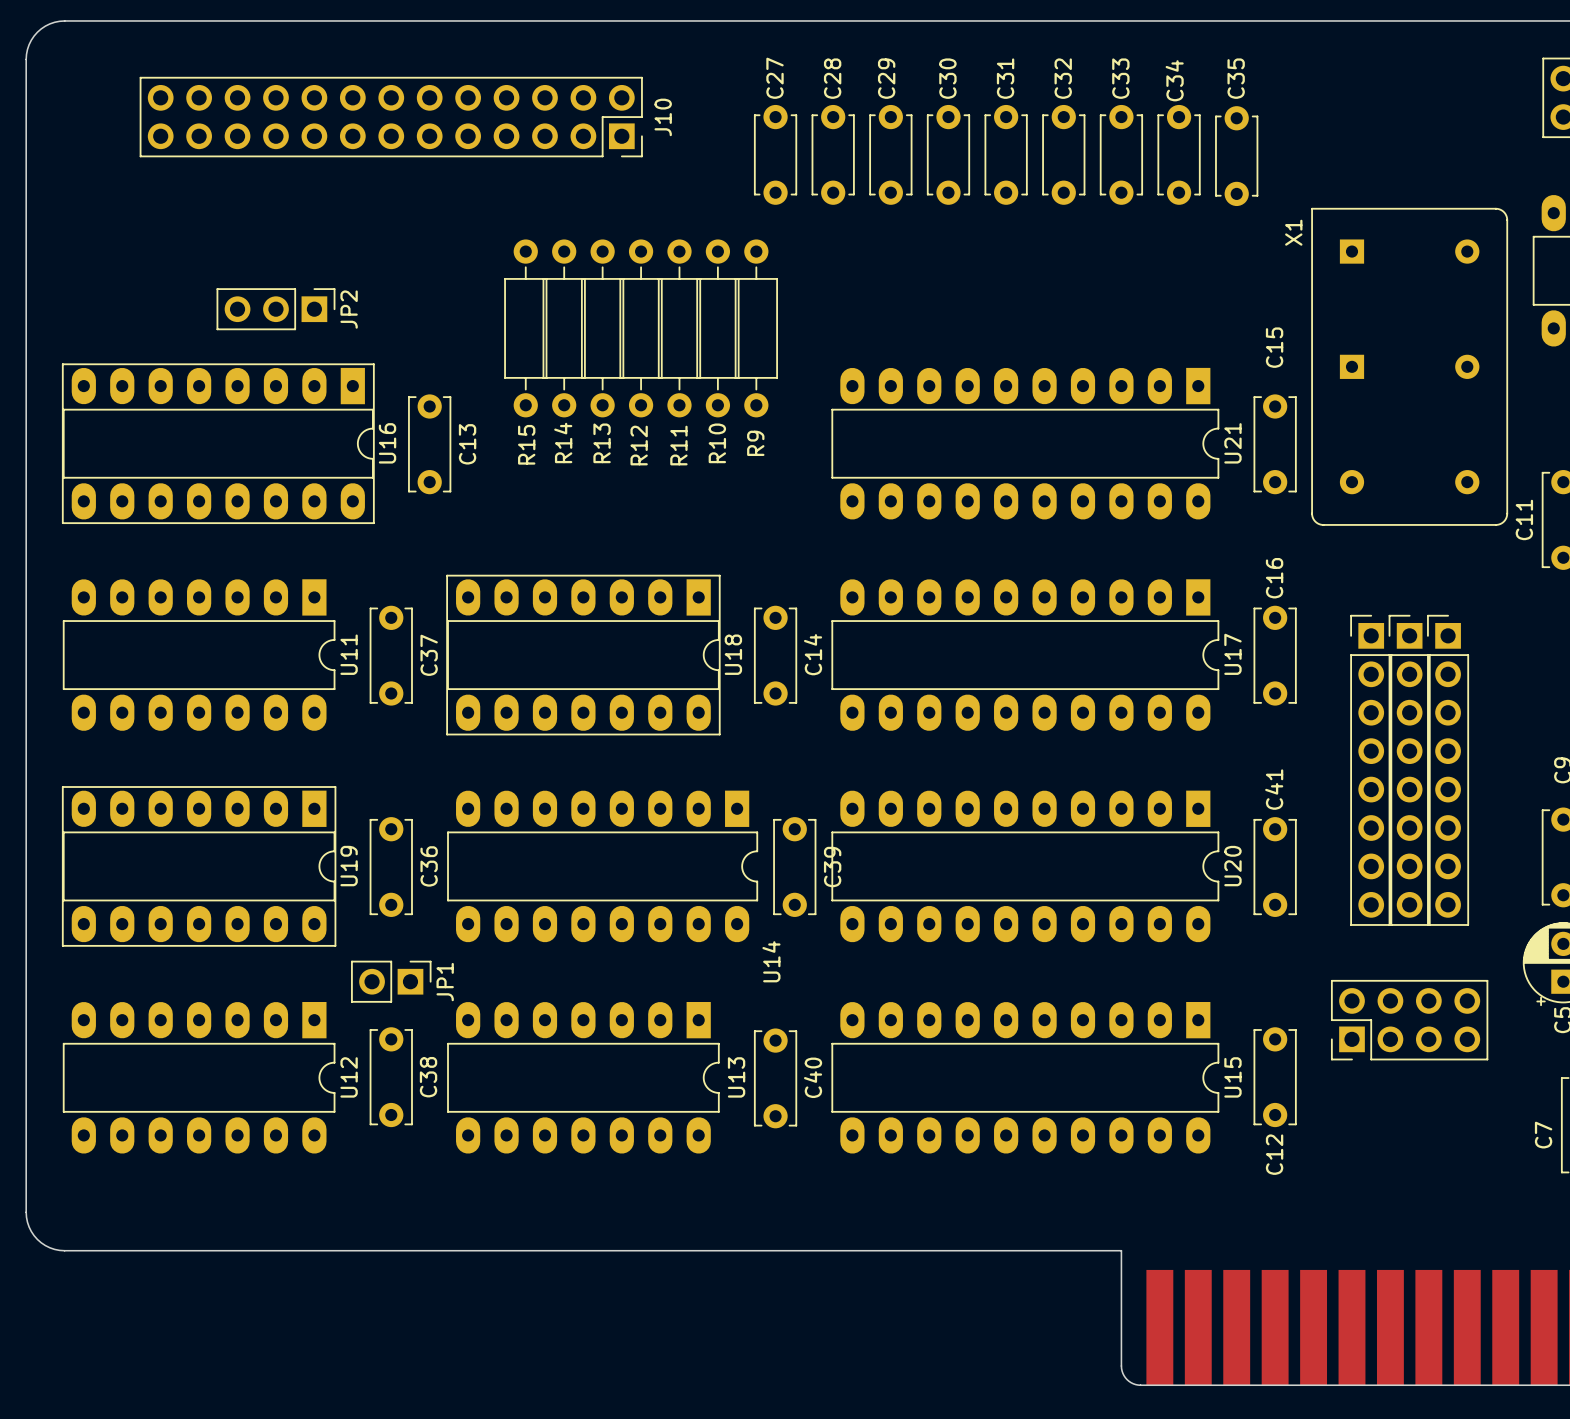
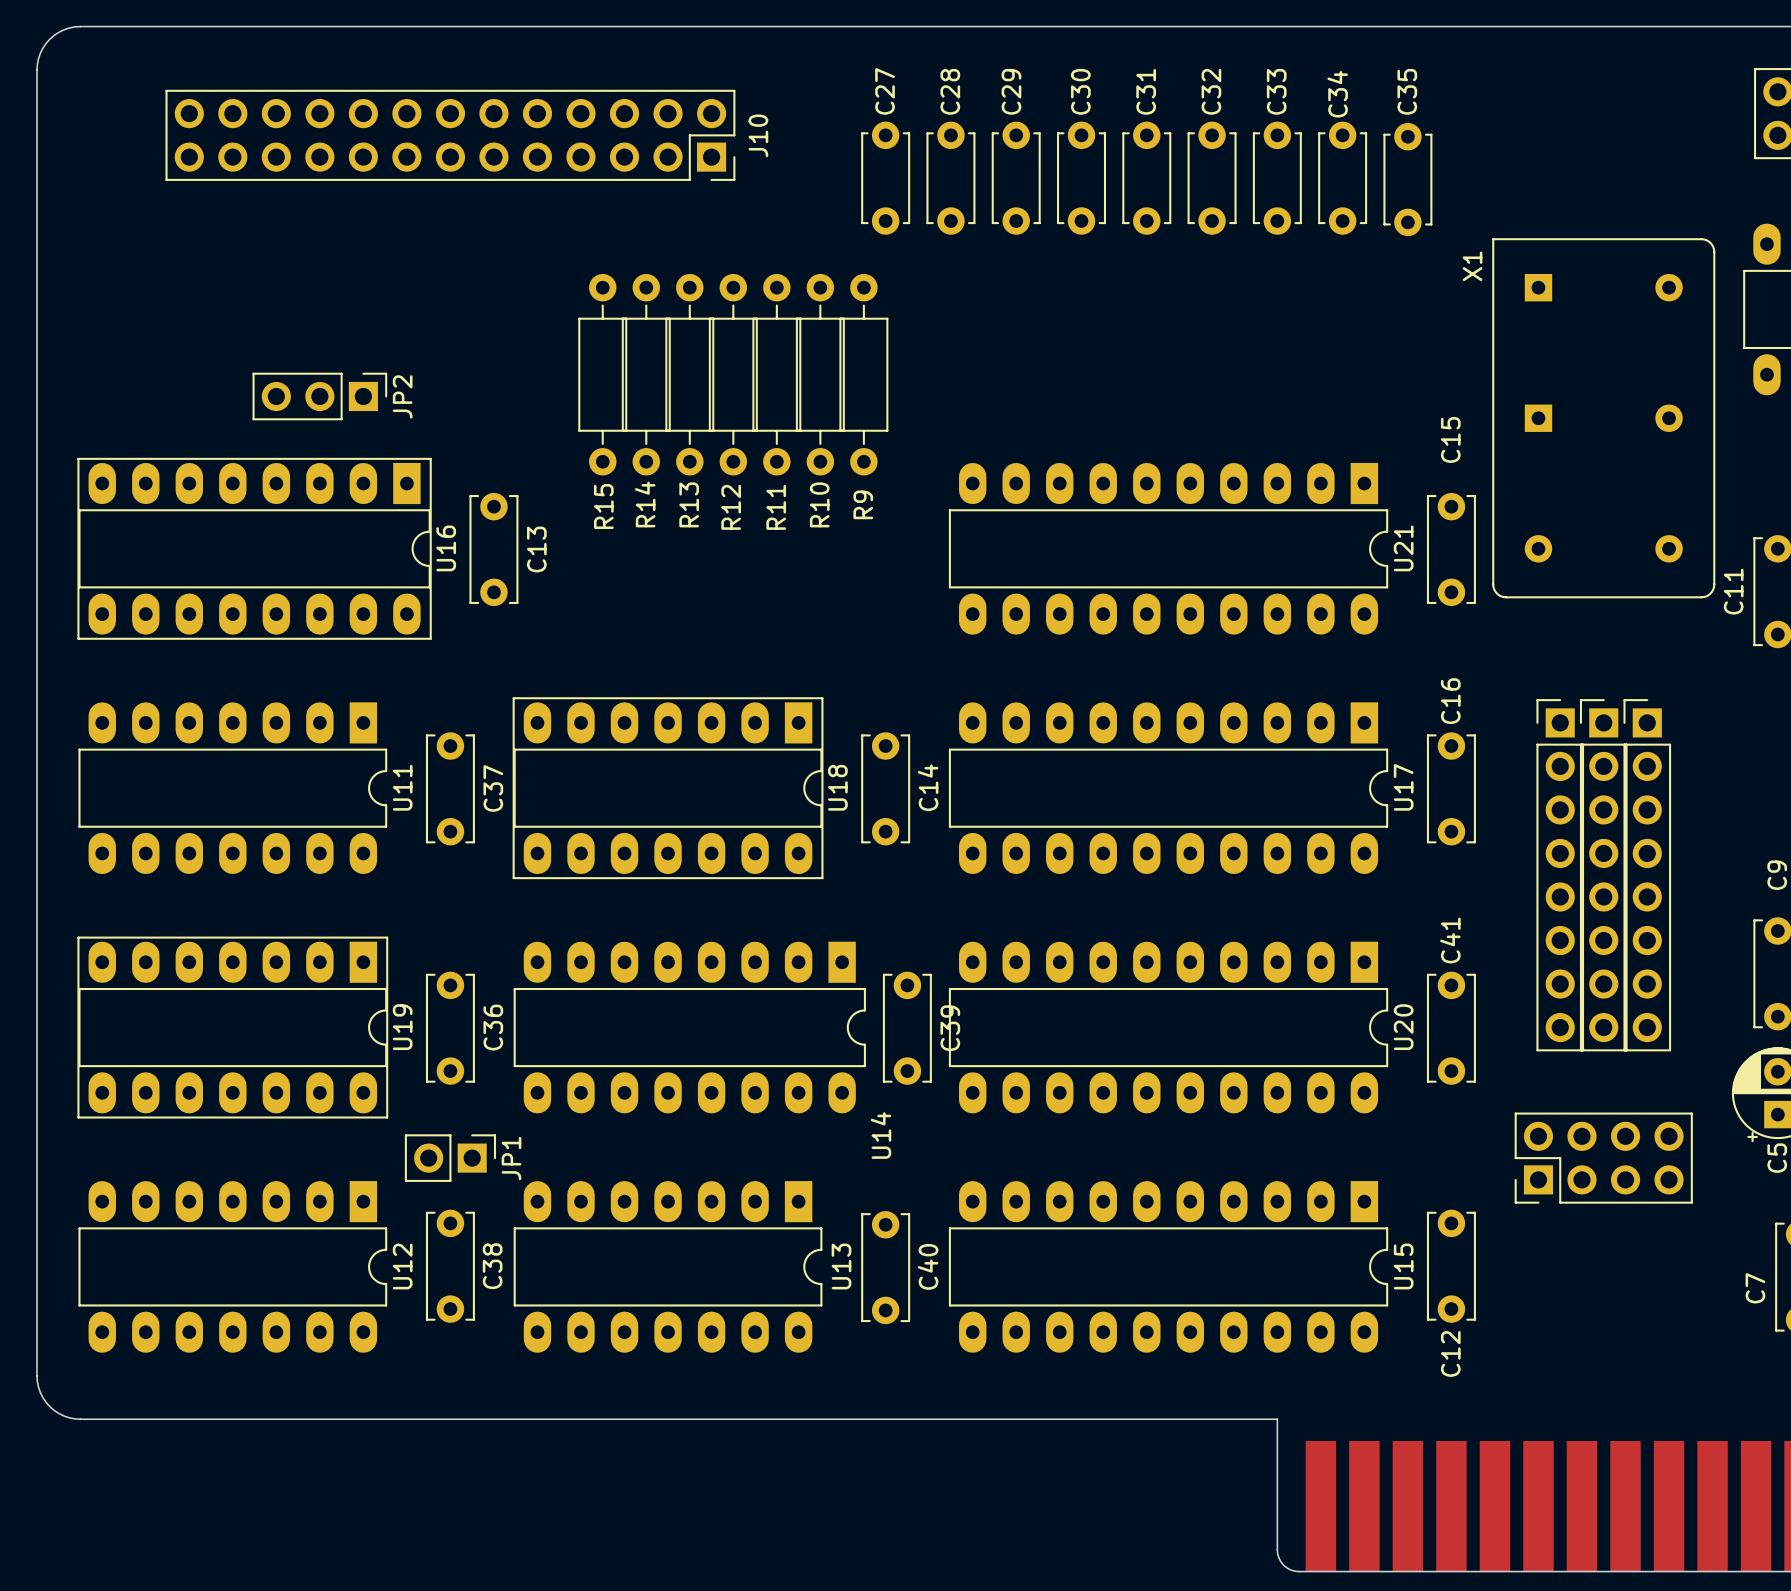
JP2 position: (275, 309) -> (319, 396)
U16 position: (218, 443) -> (254, 548)
U21 position: (1025, 443) -> (1168, 548)
C13 position: (429, 444) -> (493, 549)
C15 position: (1275, 444) -> (1451, 549)
U11 position: (199, 655) -> (232, 788)
C37 position: (391, 655) -> (450, 788)
U18 position: (583, 655) -> (668, 788)
C14 position: (775, 655) -> (885, 788)
U17 position: (1025, 655) -> (1168, 788)
C16 position: (1275, 655) -> (1451, 788)
U19 position: (199, 866) -> (232, 1027)
U14 position: (602, 866) -> (689, 1027)
U20 position: (1025, 866) -> (1168, 1027)
C36 position: (391, 867) -> (450, 1028)
C39 position: (794, 867) -> (907, 1028)
C41 position: (1275, 867) -> (1451, 1028)
JP1 position: (391, 981) -> (450, 1158)
U12 position: (199, 1077) -> (232, 1266)
C38 position: (391, 1077) -> (450, 1266)
U13 position: (583, 1077) -> (668, 1266)
U15 position: (1025, 1077) -> (1168, 1266)
C12 position: (1275, 1077) -> (1451, 1266)
C40 position: (775, 1078) -> (885, 1267)

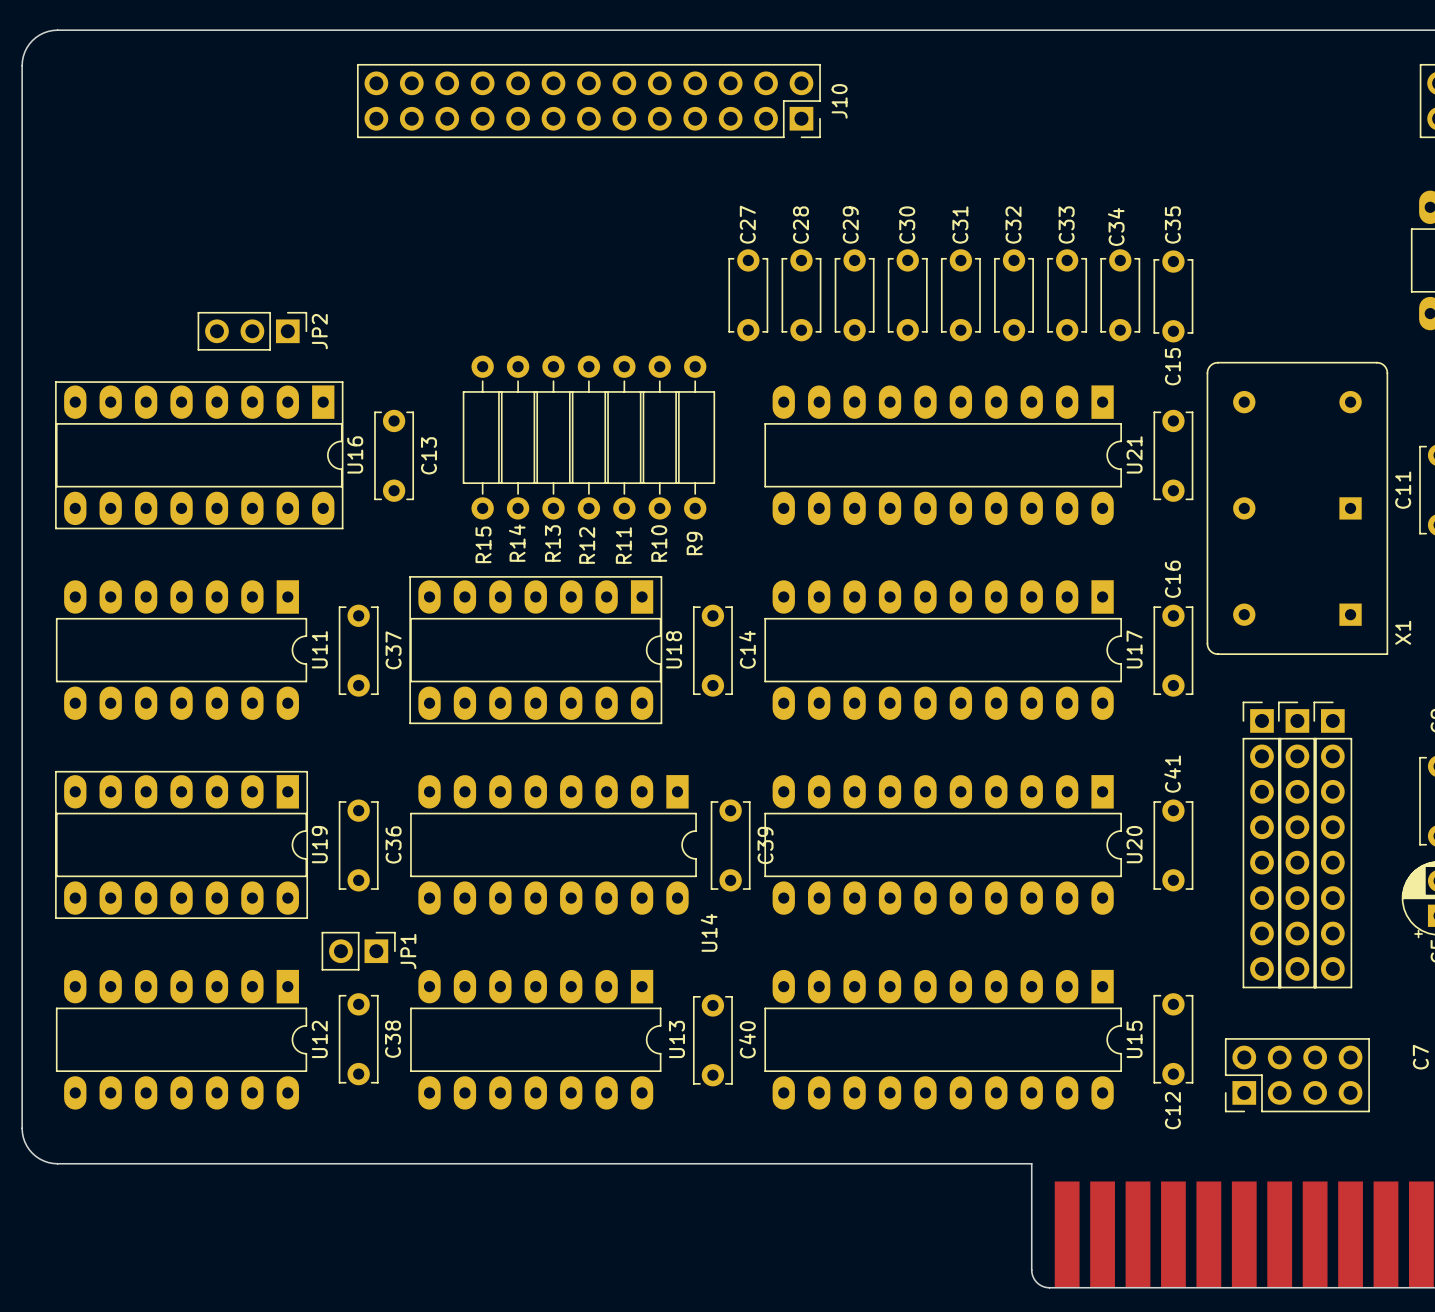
J10 position: (450, 135) -> (588, 101)
C27 position: (885, 178) -> (748, 295)
C28 position: (950, 178) -> (801, 295)
C29 position: (1016, 178) -> (854, 295)
C30 position: (1081, 178) -> (907, 295)
C31 position: (1146, 178) -> (960, 295)
C32 position: (1212, 178) -> (1014, 295)
C33 position: (1277, 178) -> (1067, 295)
C34 position: (1342, 178) -> (1120, 295)
C35 position: (1407, 179) -> (1173, 296)
R15 position: (602, 374) -> (482, 437)
R14 position: (646, 374) -> (518, 437)
R13 position: (689, 374) -> (553, 437)
R12 position: (733, 374) -> (588, 437)
R11 position: (776, 374) -> (624, 437)
R10 position: (820, 374) -> (659, 437)
R9 position: (863, 374) -> (695, 437)
X1 rotation: 0° (1603, 418) -> 180° (1297, 508)
part: (1560, 875) -> none
part: (1603, 875) -> none
part: (1647, 875) -> none
part: none -> (1261, 844)
part: none -> (1297, 844)
part: none -> (1332, 844)
part position: (1603, 1158) -> (1297, 1075)

